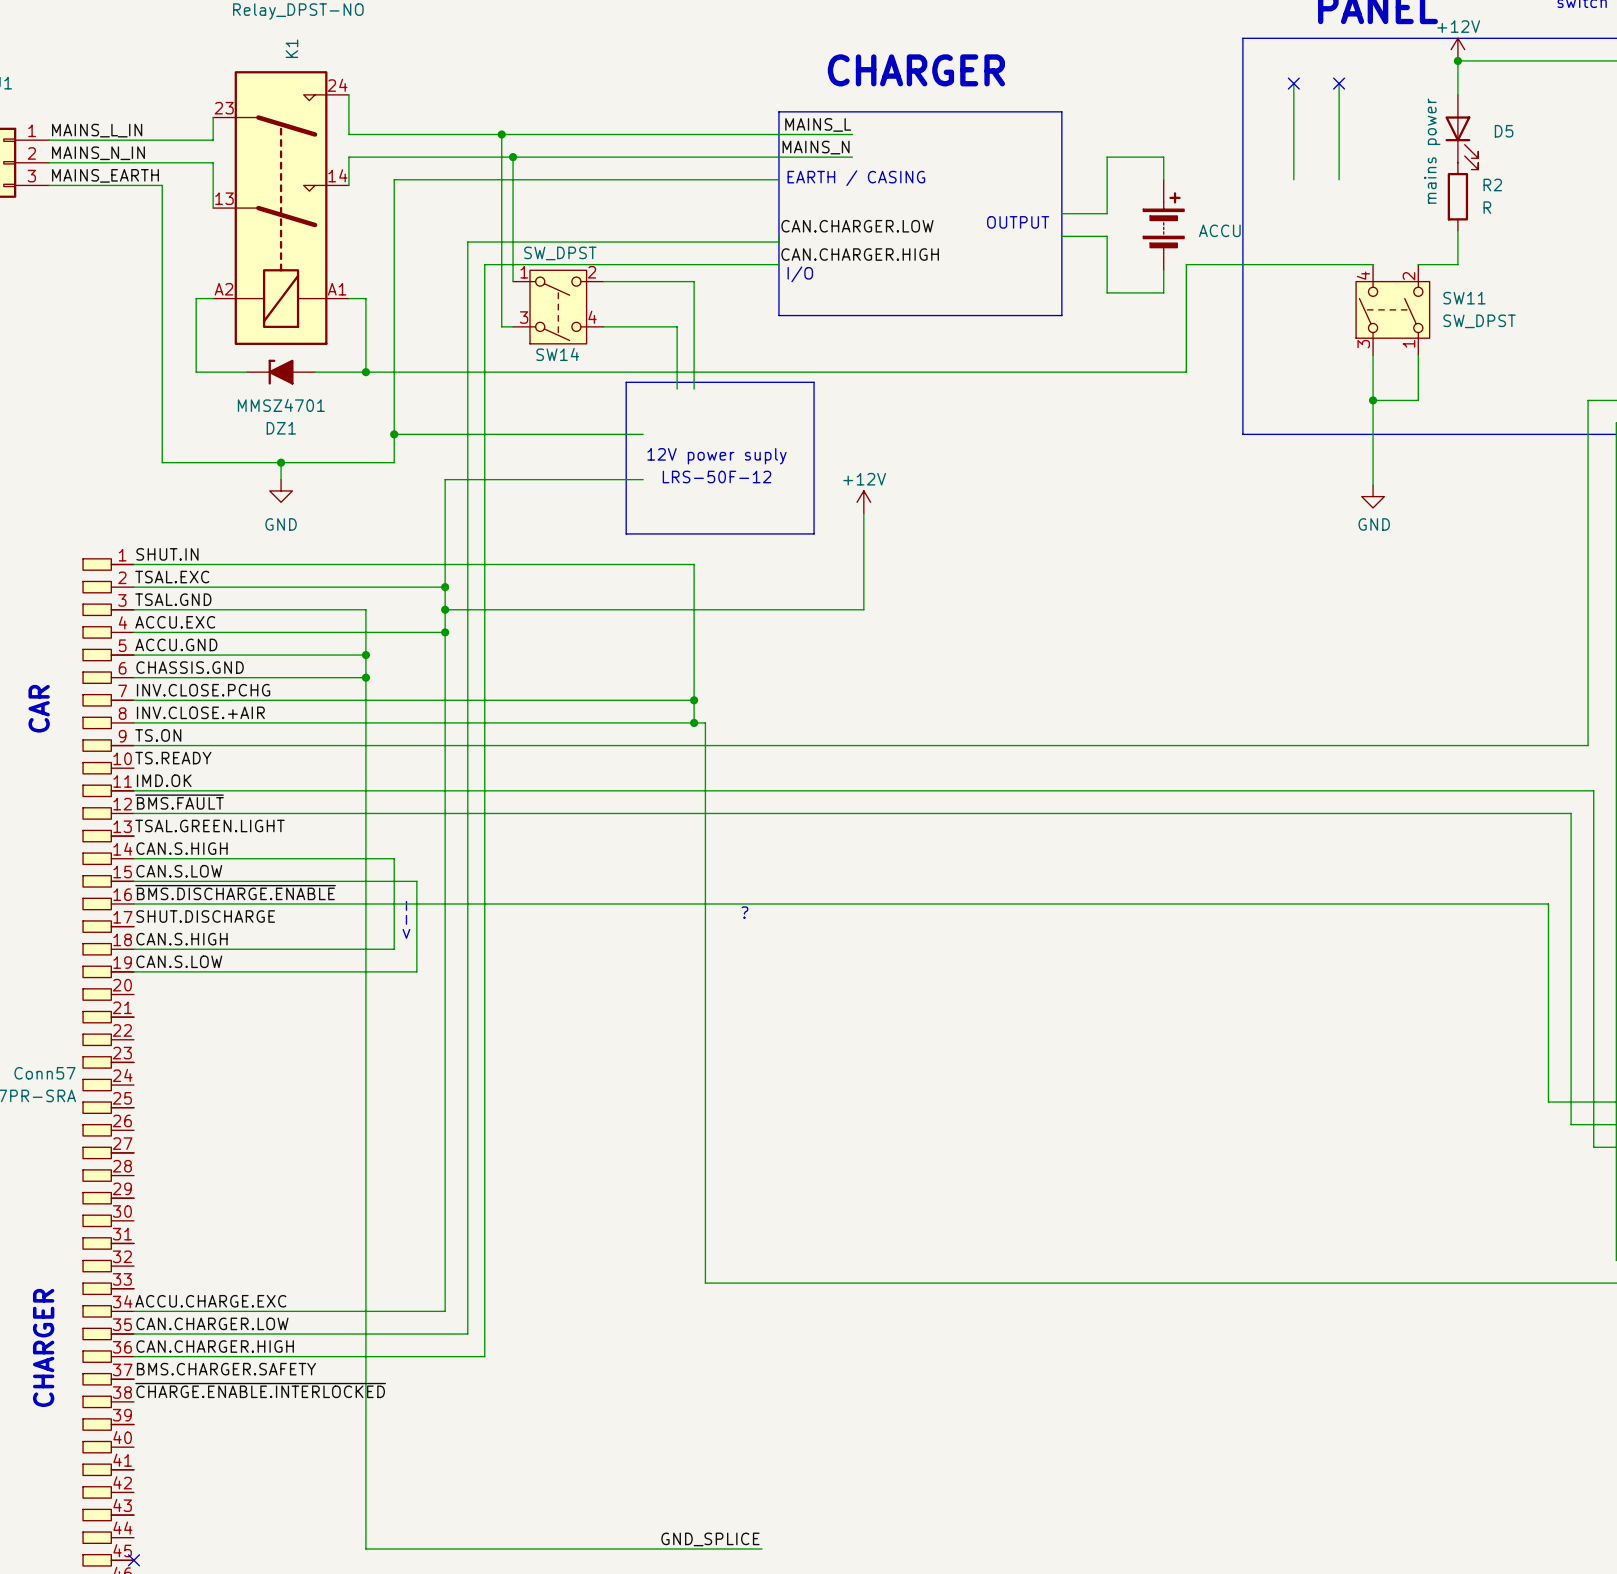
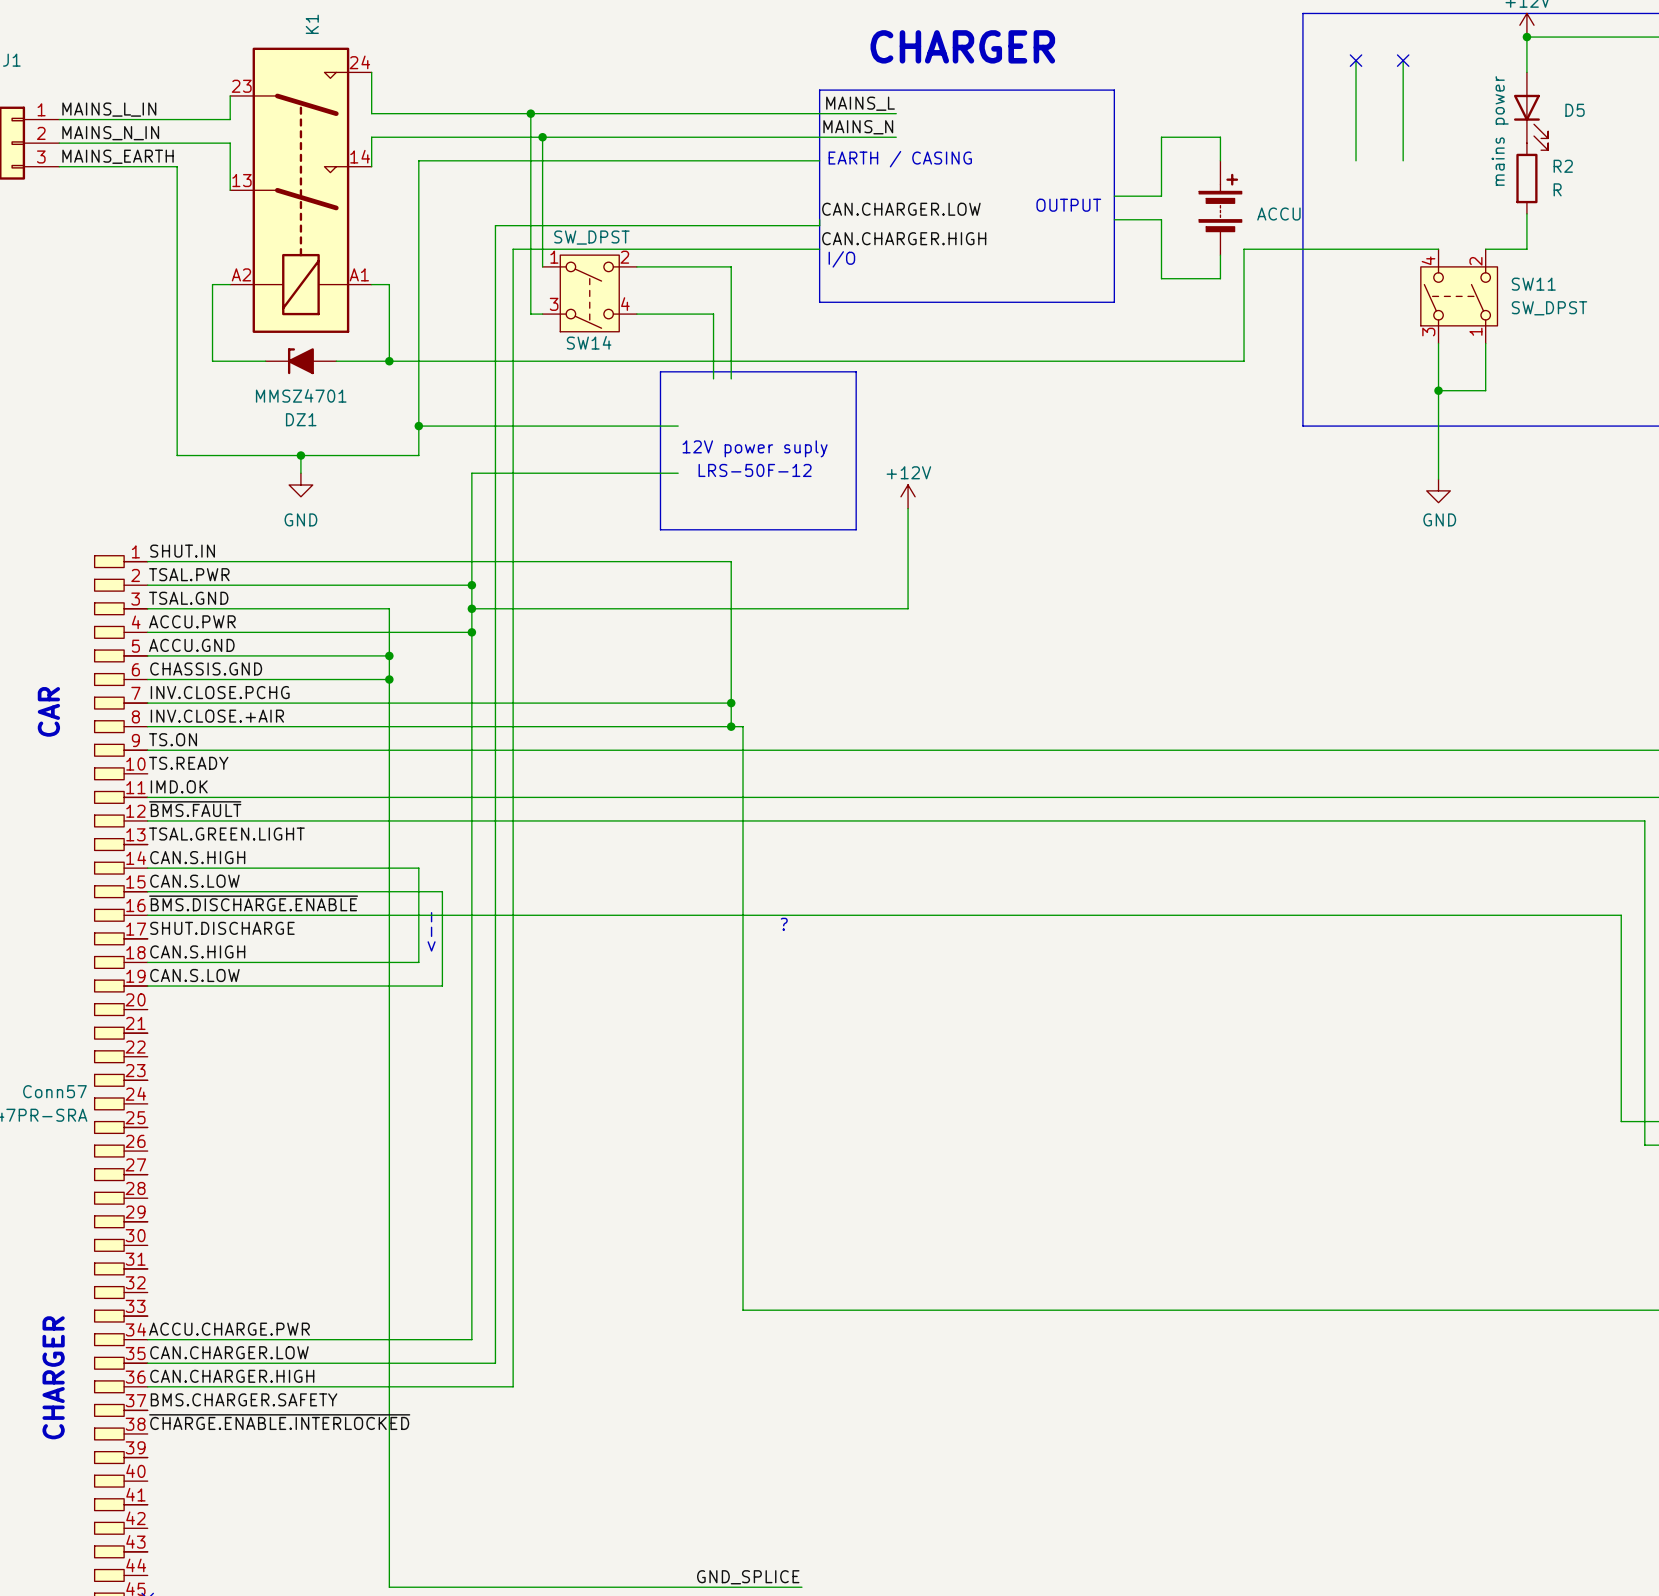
label: TSAL.EXC (172, 577) -> TSAL.PWR (189, 574)
label: ACCU.EXC (175, 622) -> ACCU.PWR (192, 621)
label: ACCU.CHARGE.EXC (210, 1301) -> ACCU.CHARGE.PWR (229, 1329)

